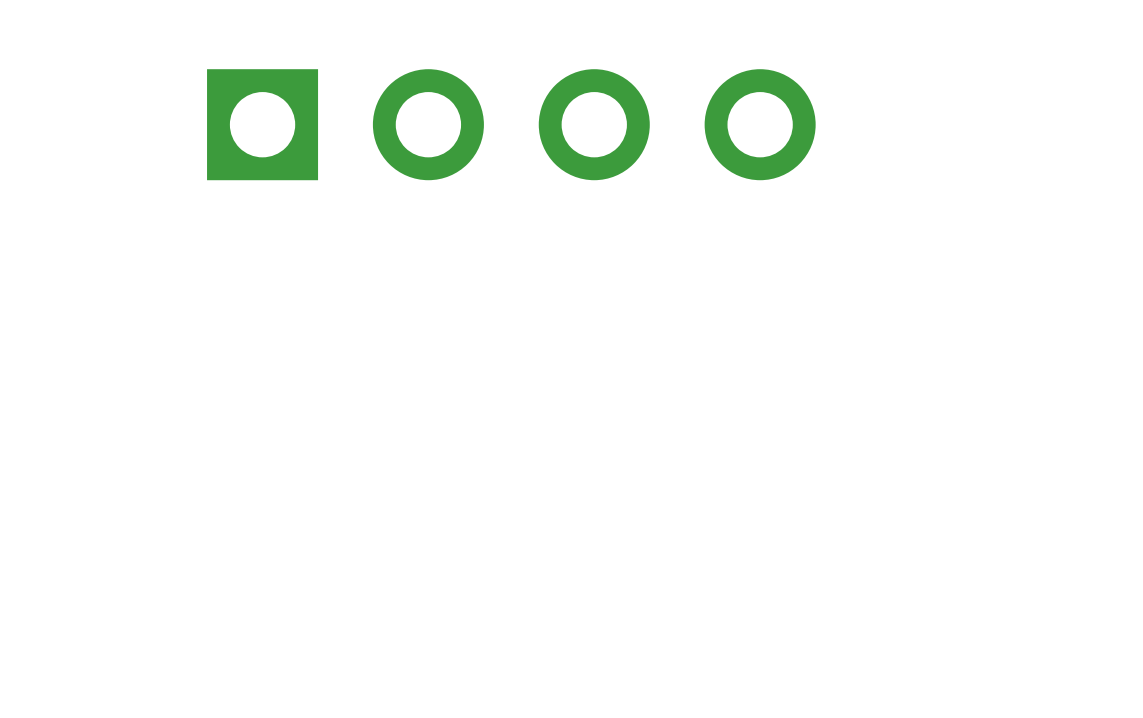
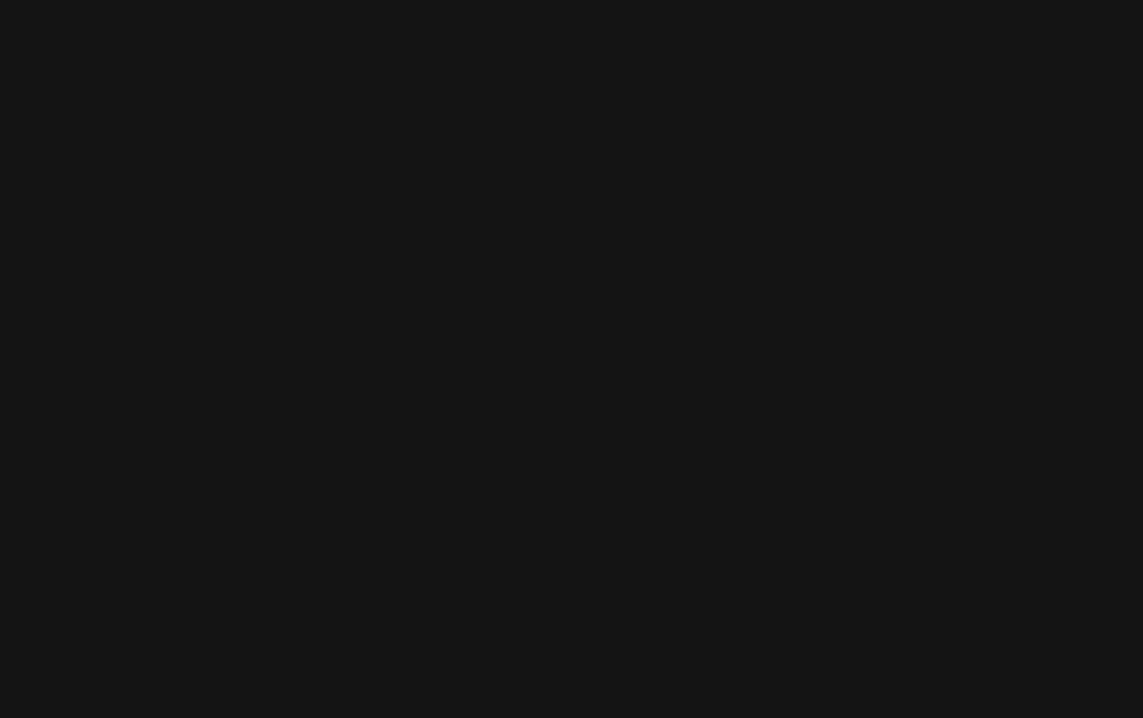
part: (511, 124) -> none

